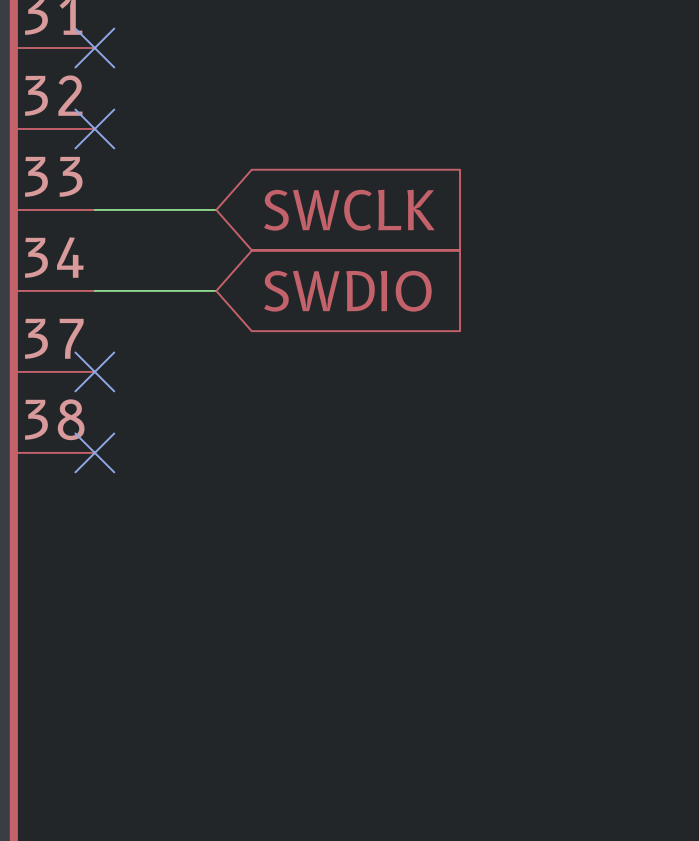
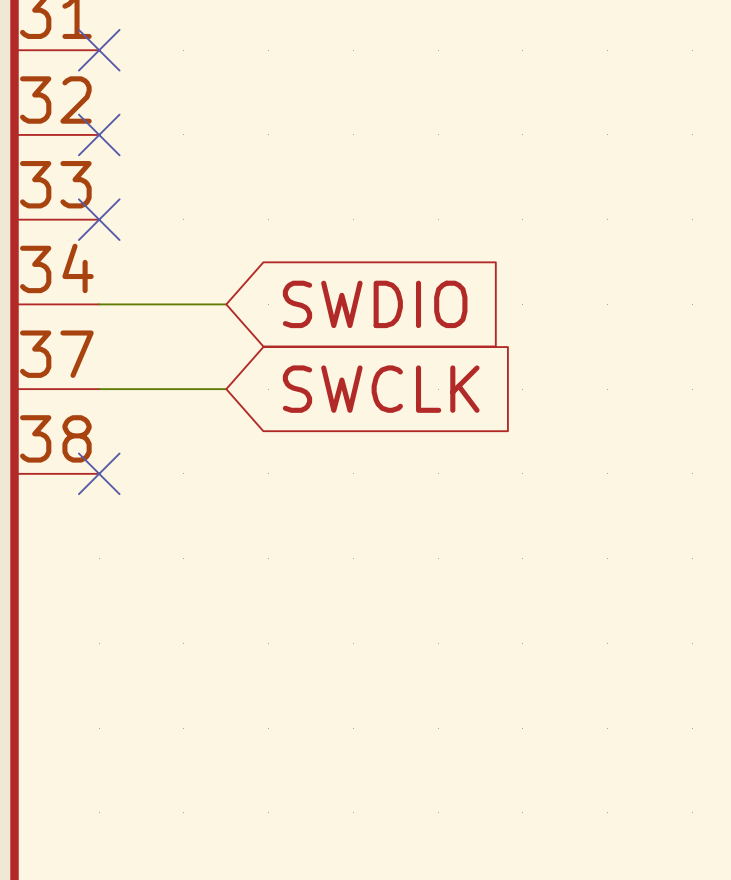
wire: (94, 209) (216, 209) -> (99, 389) (226, 389)
global label position: SWCLK (349, 210) -> SWCLK (381, 389)
no-connect mark position: (94, 371) -> (99, 219)

